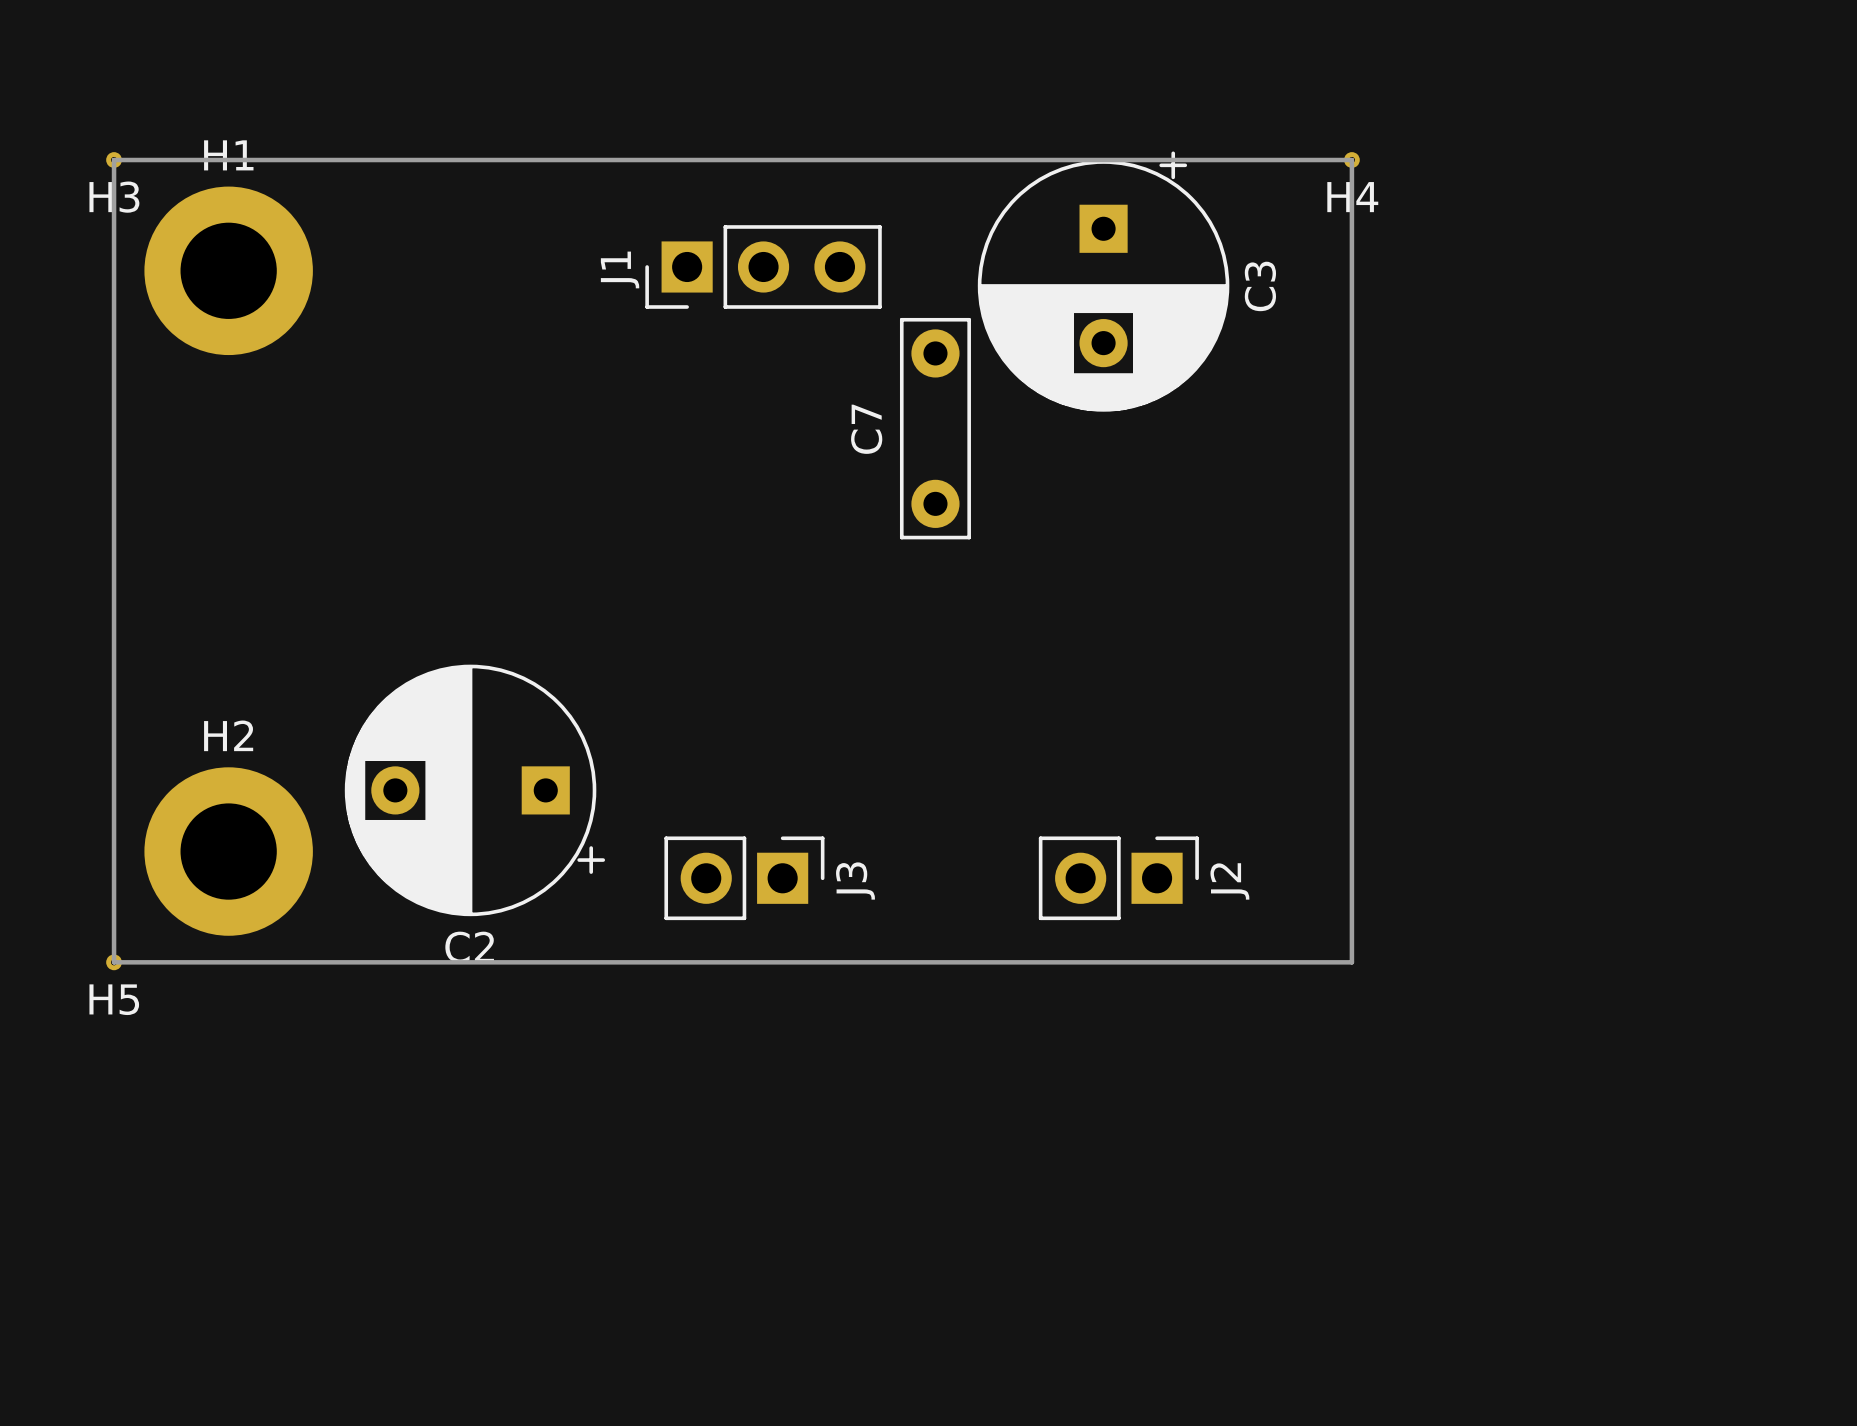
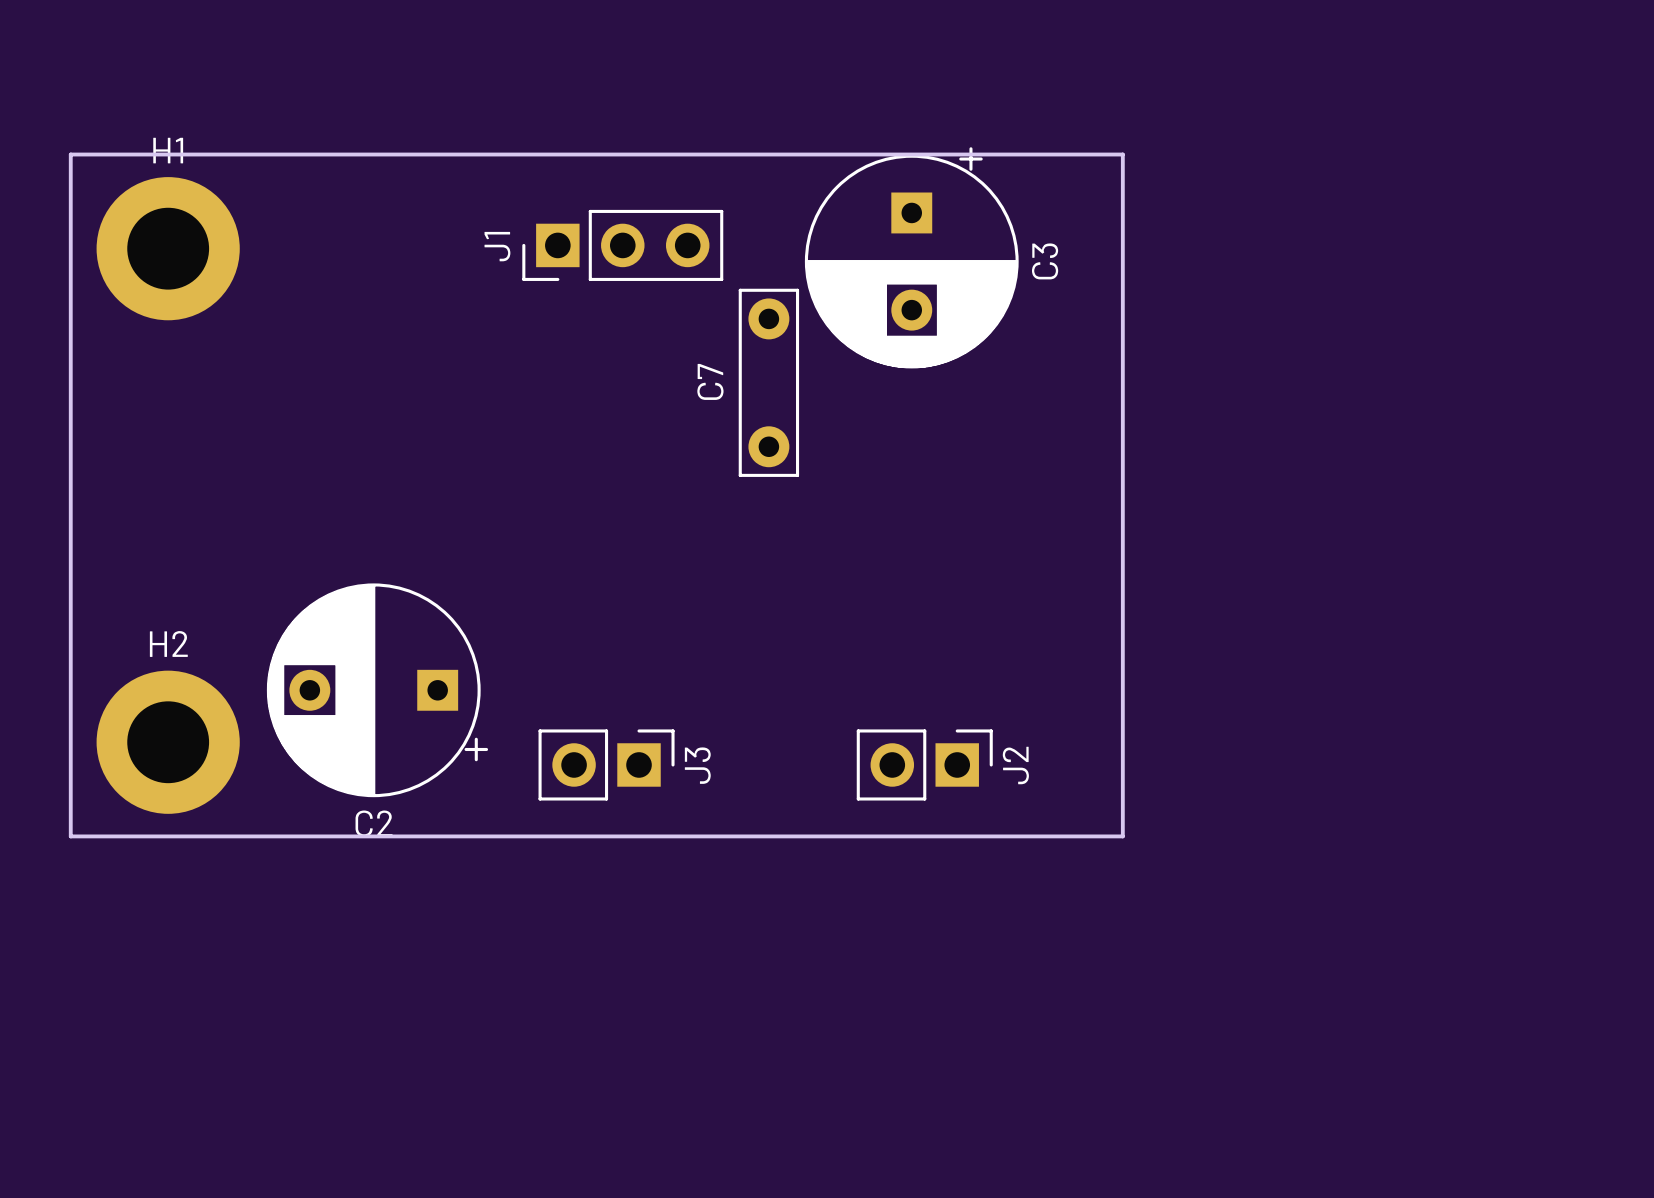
H3: (114, 160) -> none
H4: (1351, 160) -> none
H5: (114, 962) -> none

